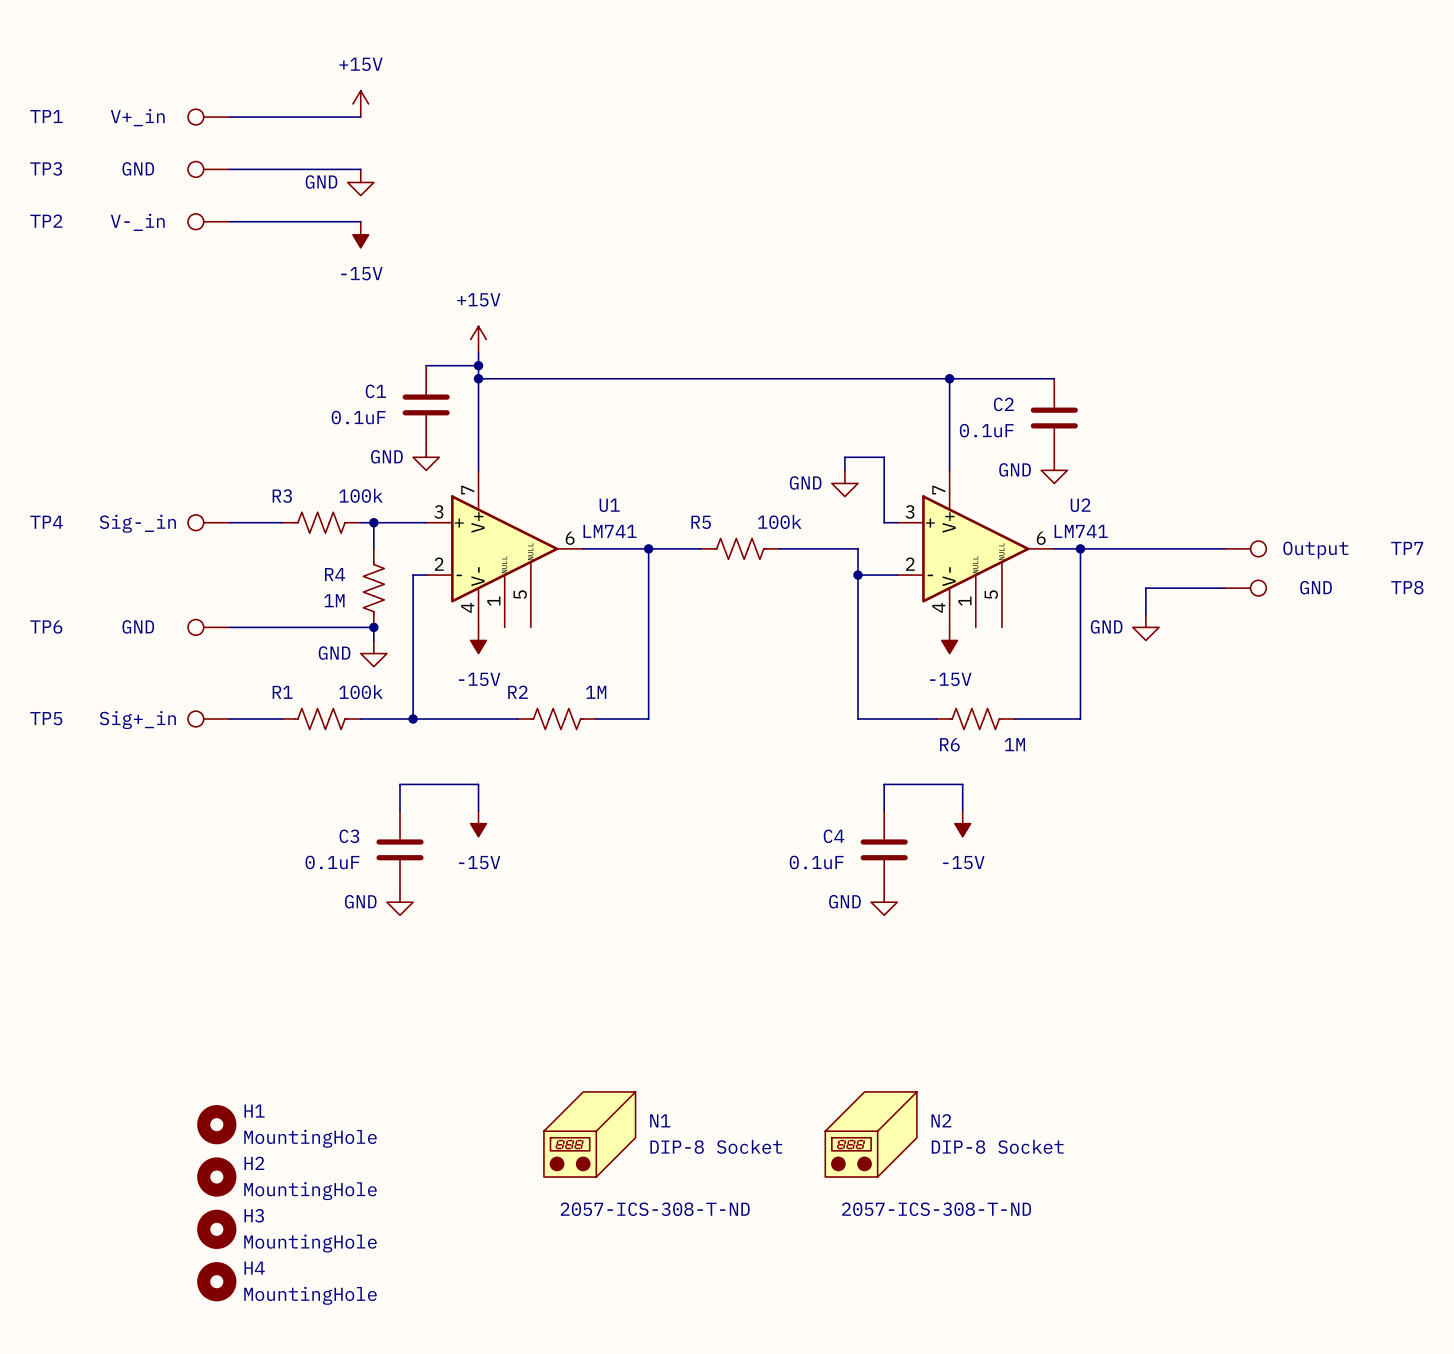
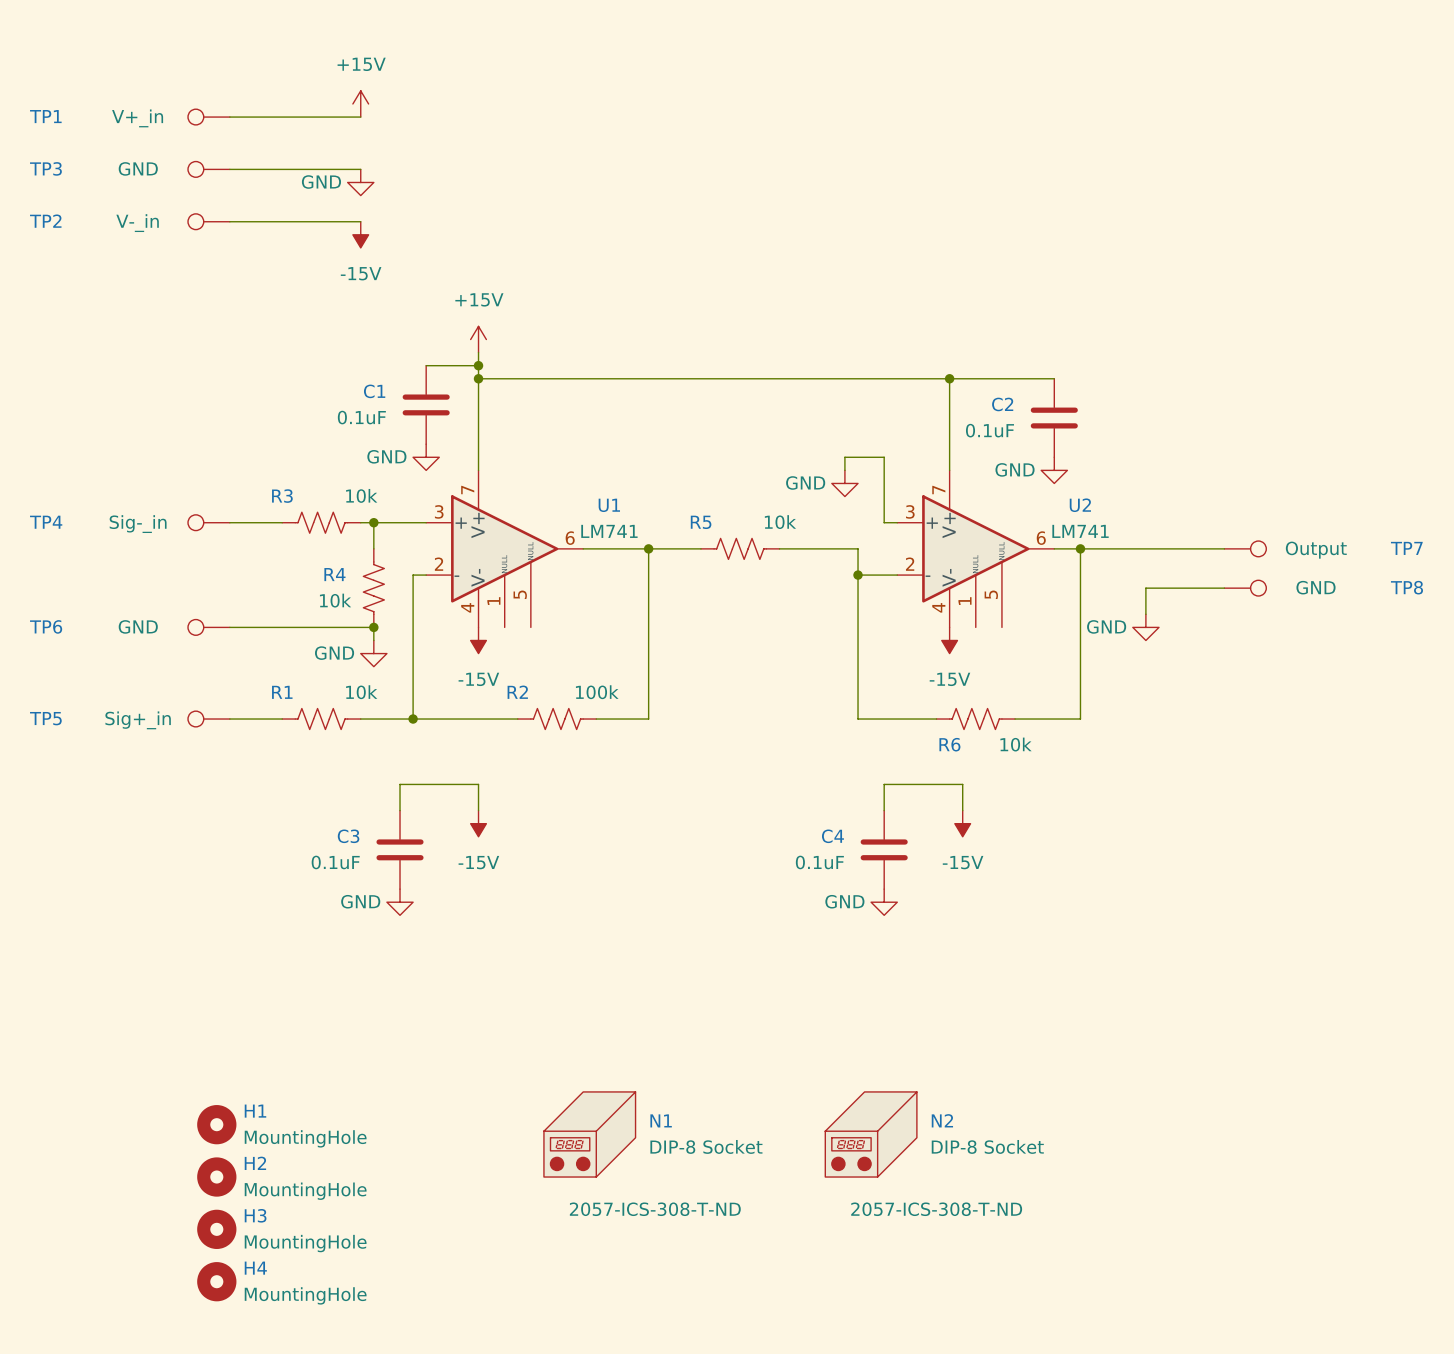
R3 value: 100k (361, 495) -> 10k (361, 495)
R5 value: 100k (779, 521) -> 10k (780, 522)
R4 value: 1M (334, 600) -> 10k (335, 600)
R1 value: 100k (361, 692) -> 10k (361, 692)
R2 value: 1M (596, 692) -> 100k (597, 692)
R6 value: 1M (1014, 744) -> 10k (1016, 744)

